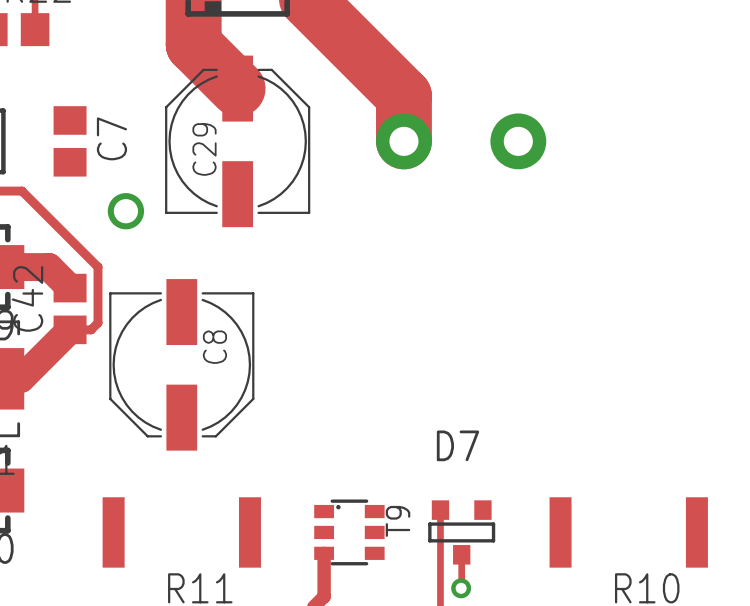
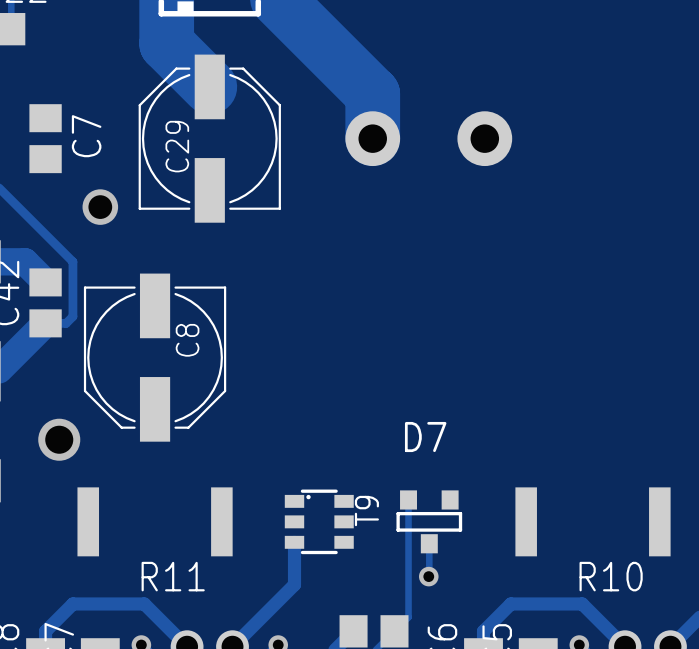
via: none -> (59, 439)

